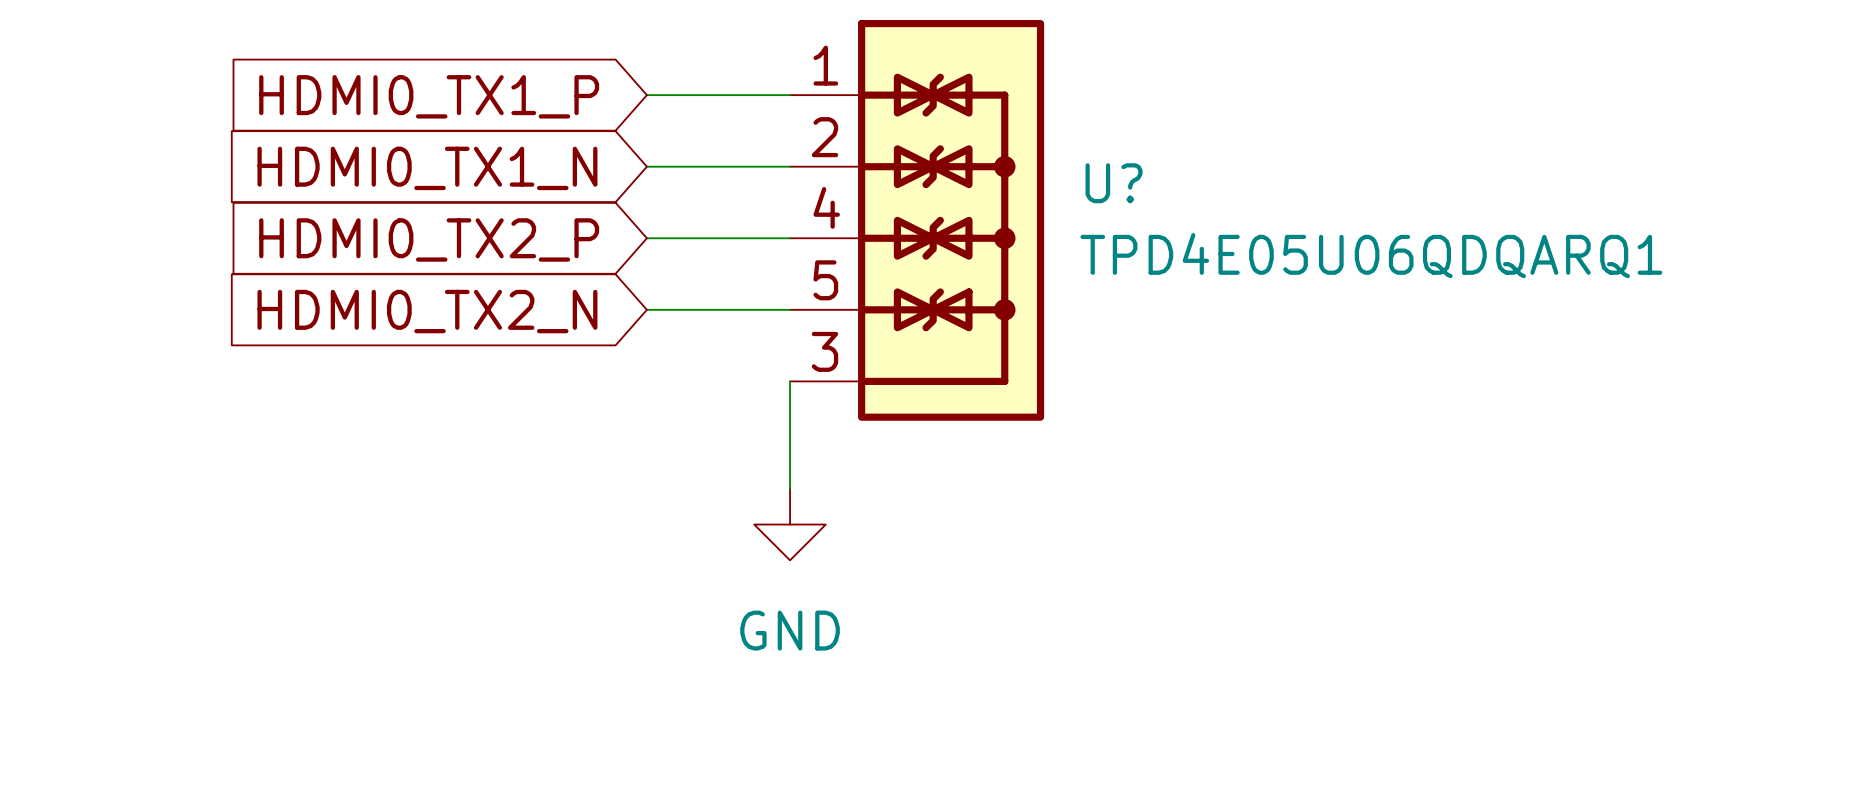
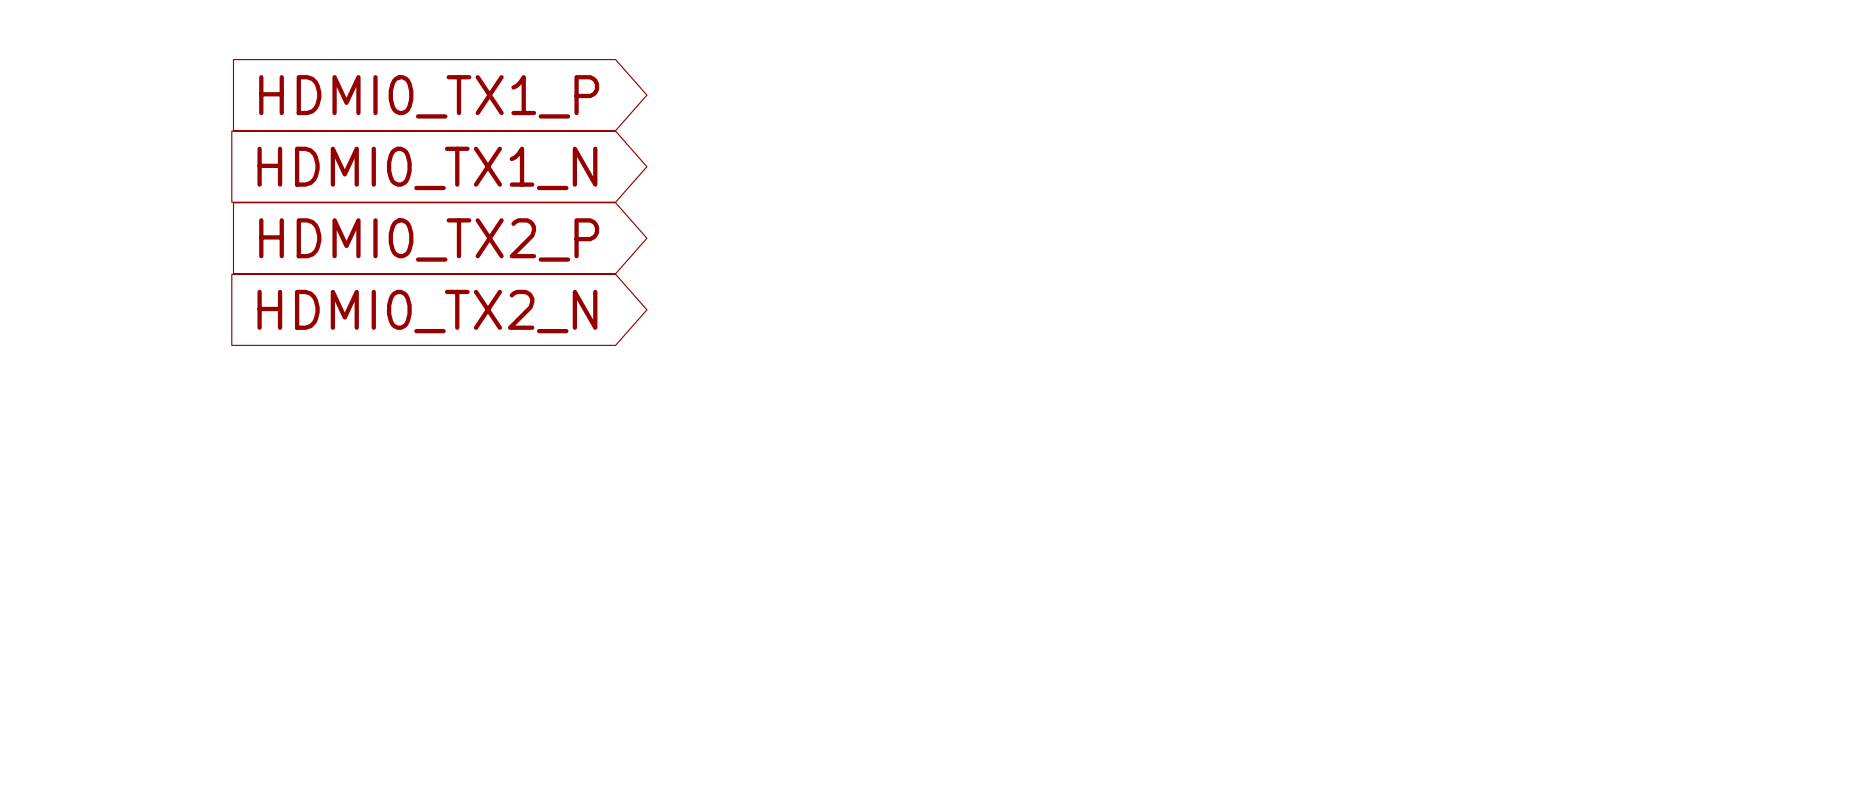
wire: (646, 95) (790, 95) -> none
wire: (646, 166) (790, 166) -> none
U?: TPD4E05U06QDQARQ1 (917, 220) -> none
wire: (646, 238) (790, 238) -> none
wire: (646, 309) (790, 309) -> none
wire: (790, 381) (790, 488) -> none
power symbol: GND (790, 524) -> none

